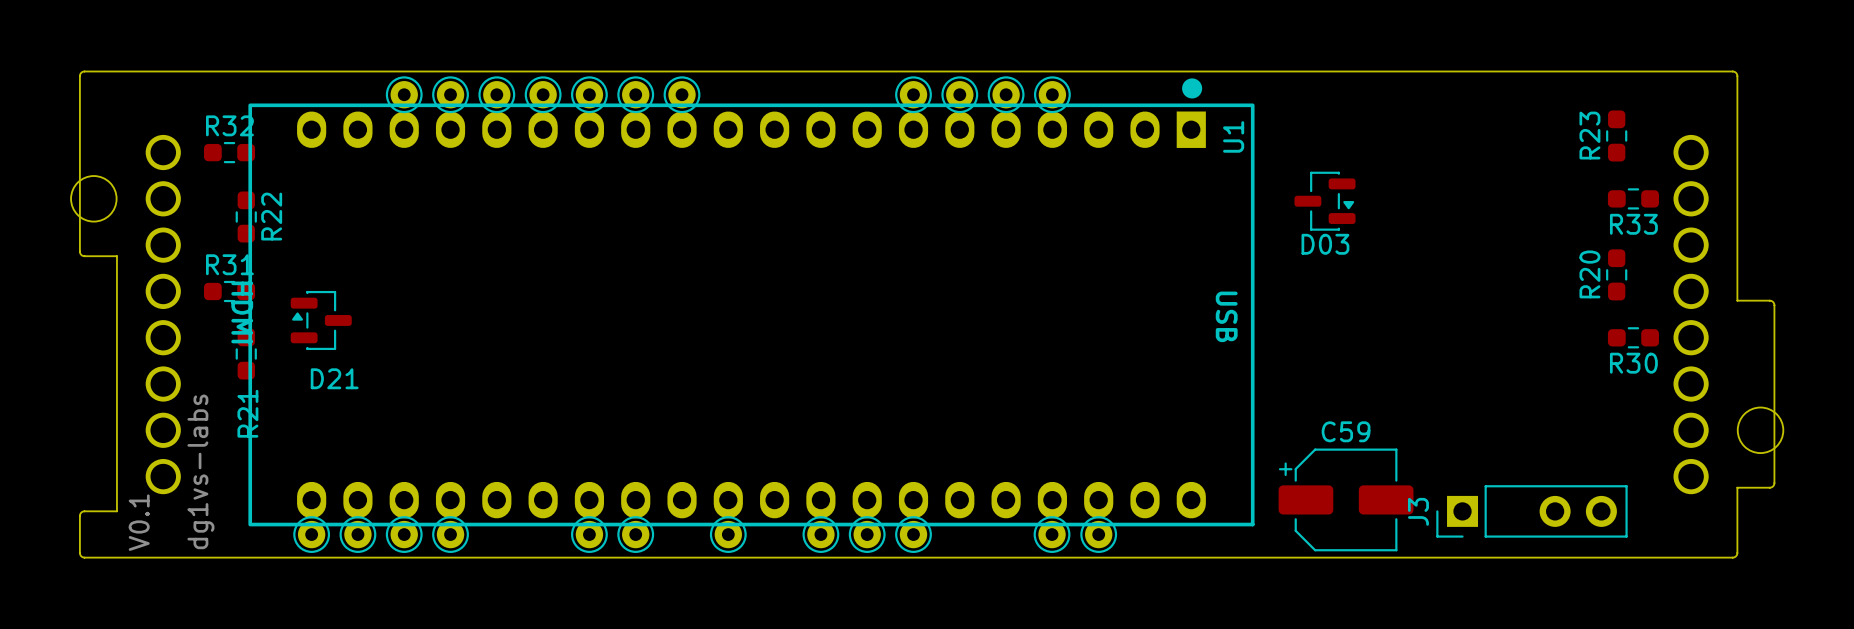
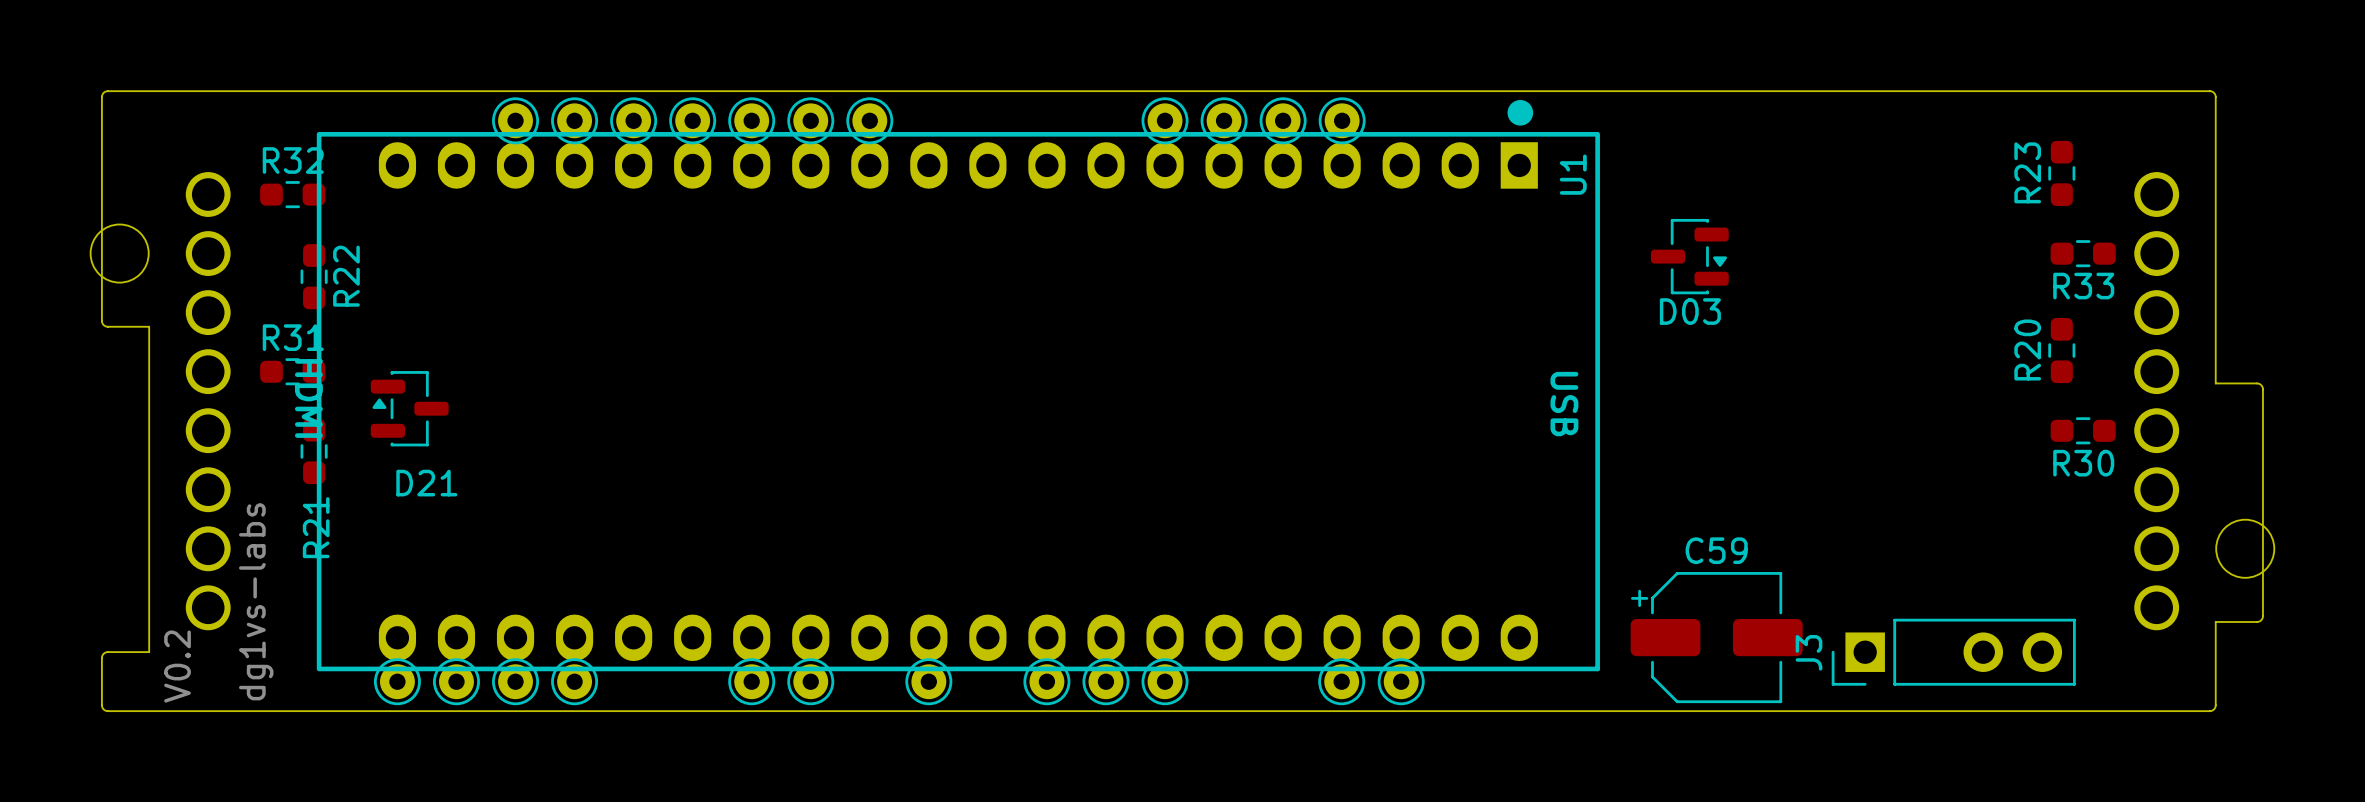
text: V0.1 (139, 522) -> V0.2 (177, 666)

